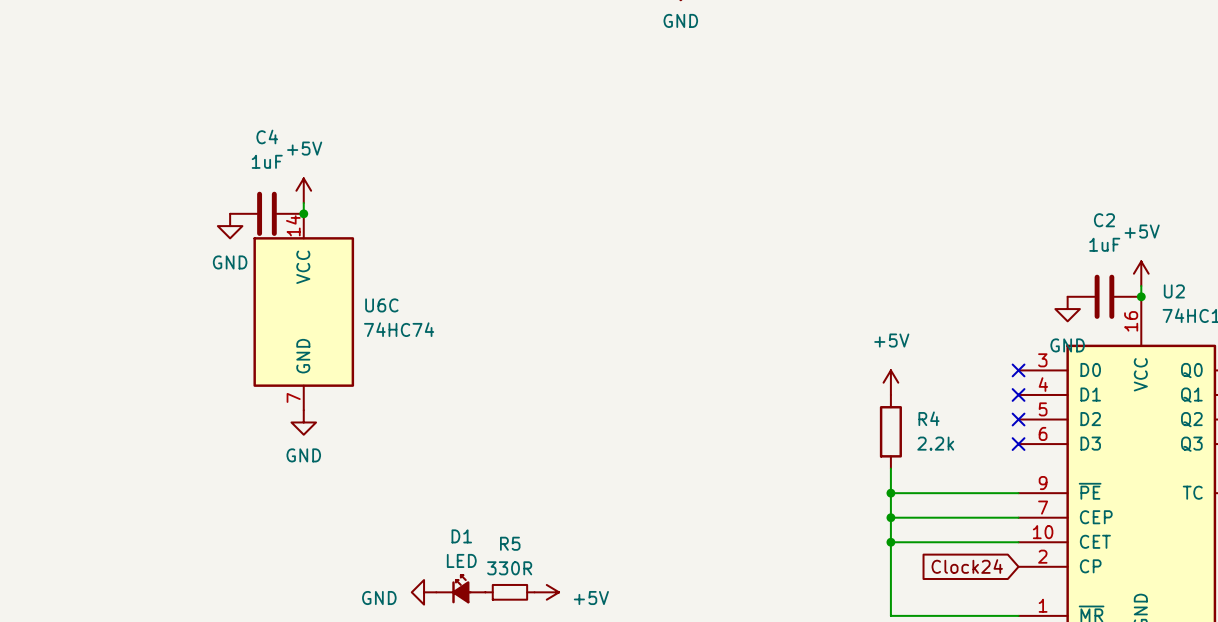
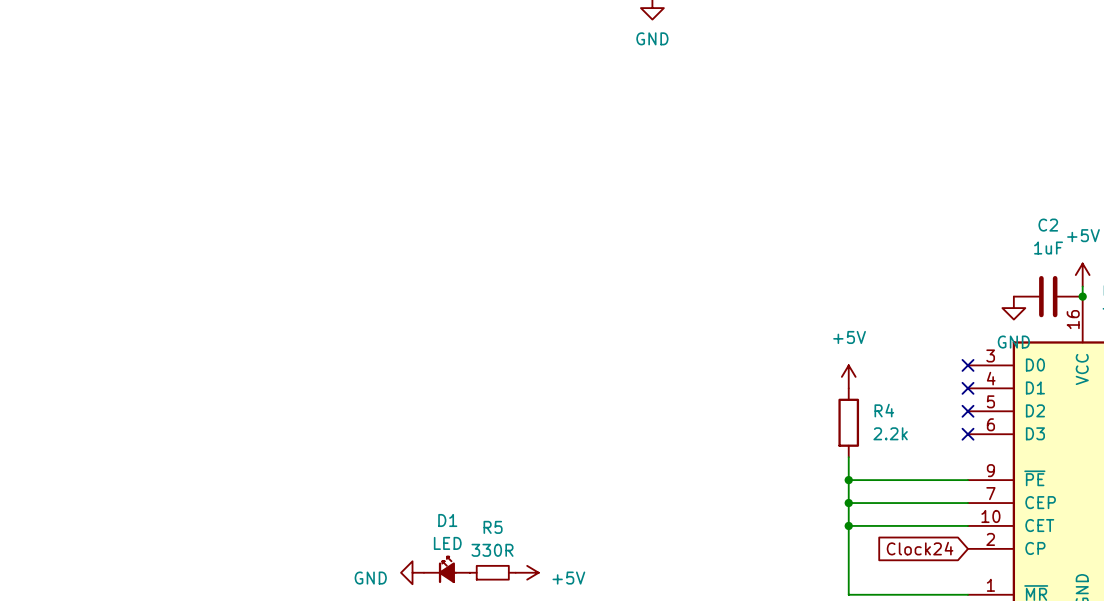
power symbol: +5V (303, 190) -> none
wire: (303, 203) (303, 213) -> none
C4: 1uF (266, 213) -> none
junction: (303, 213) -> none
power symbol: GND (230, 226) -> none
U6C: 74HC74 (303, 312) -> none
power symbol: GND (303, 422) -> none

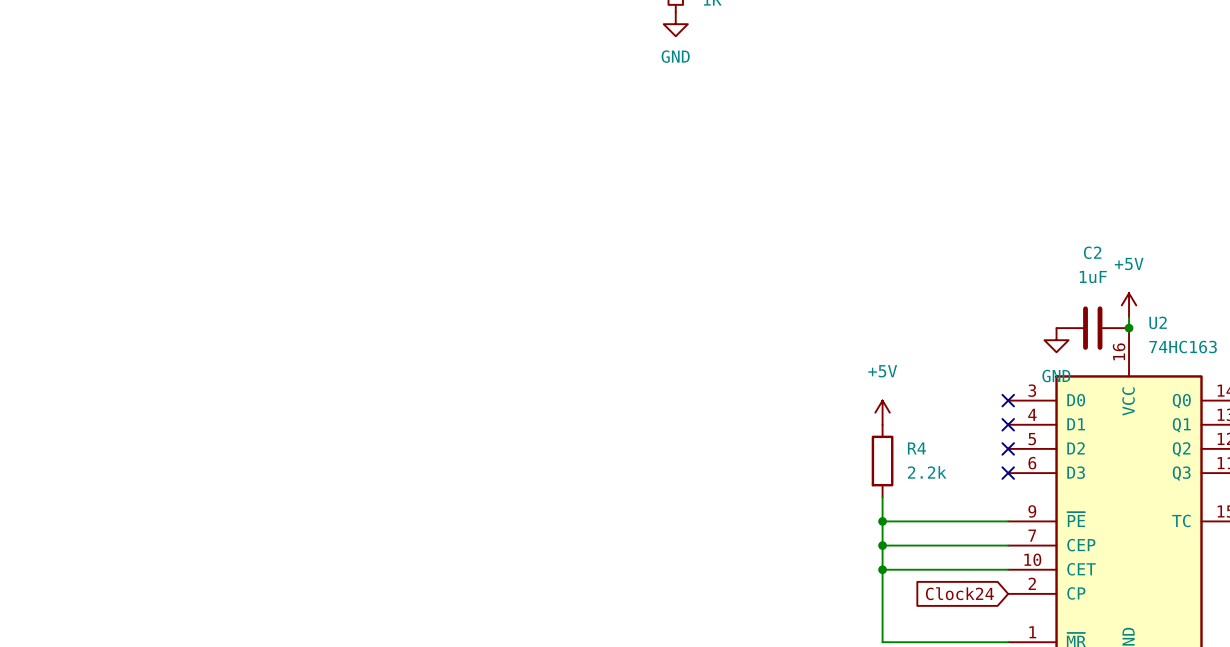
D1: LED (446, 569) -> none
power symbol: GND (412, 572) -> none
R5: 330R (492, 572) -> none
power symbol: +5V (527, 572) -> none

